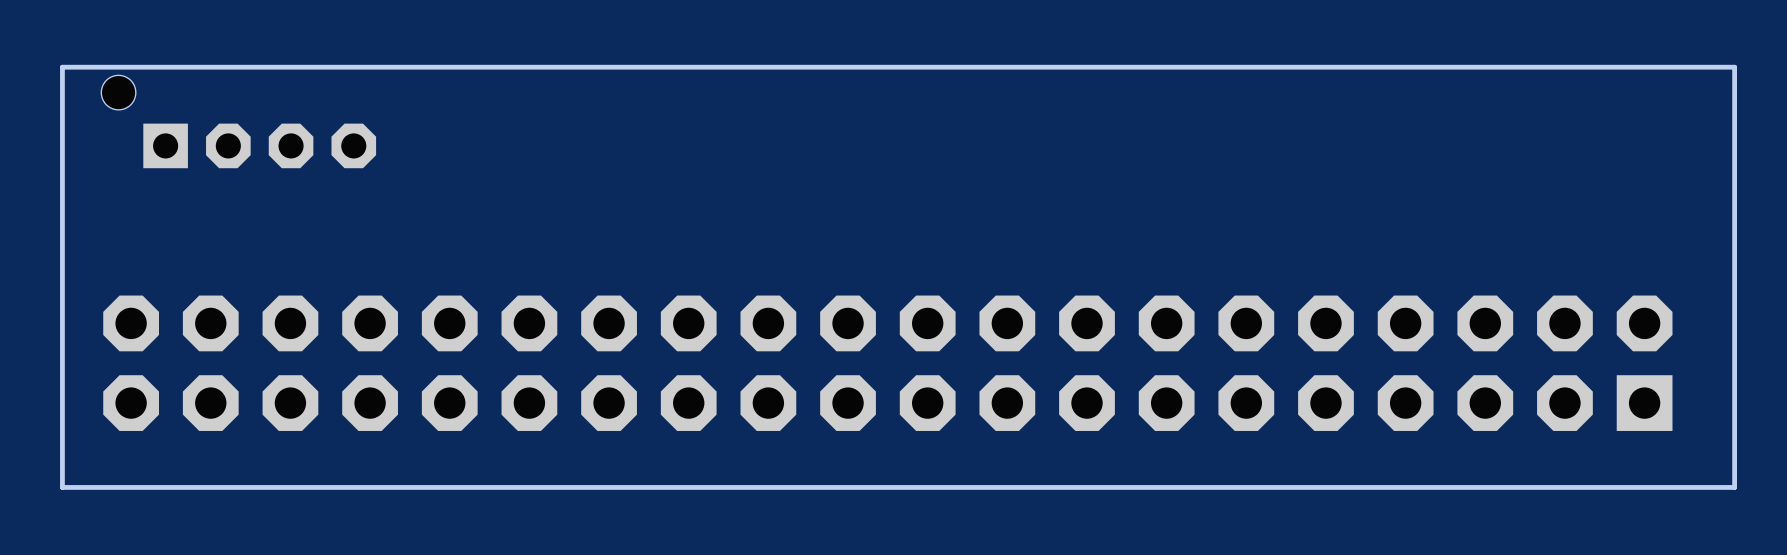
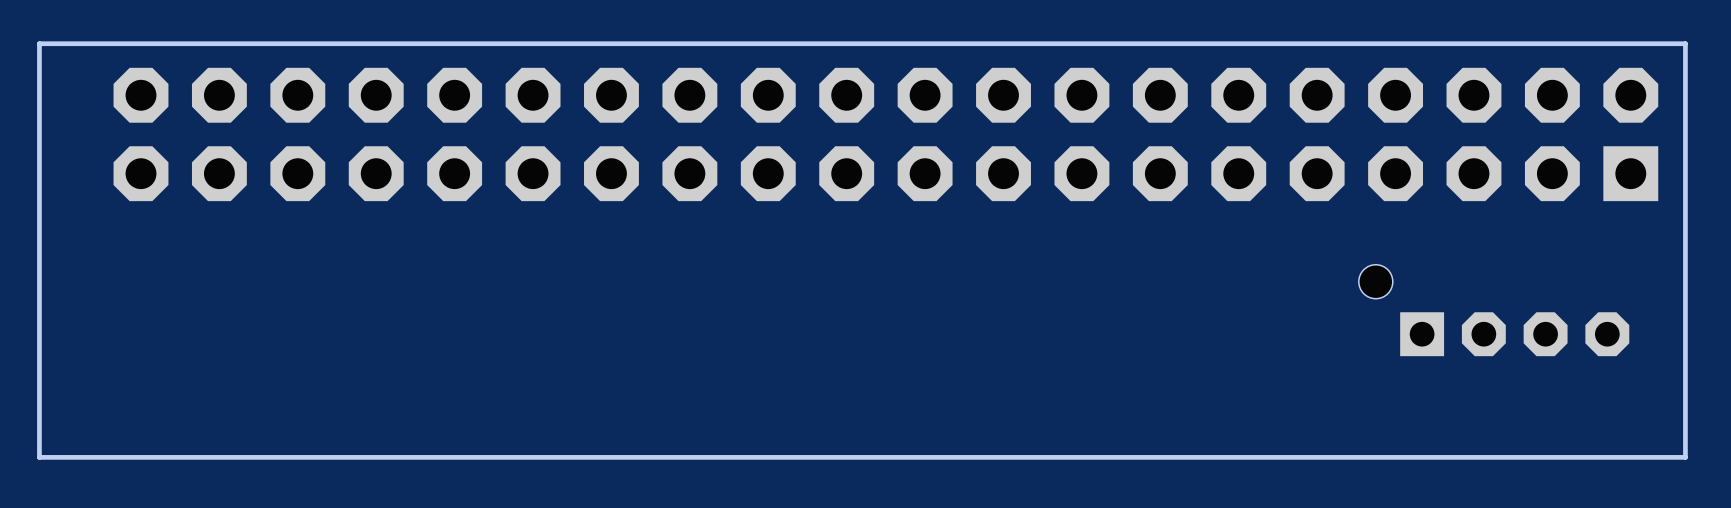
part: (238, 121) -> none
part: none -> (1494, 310)
part position: (887, 363) -> (885, 134)

